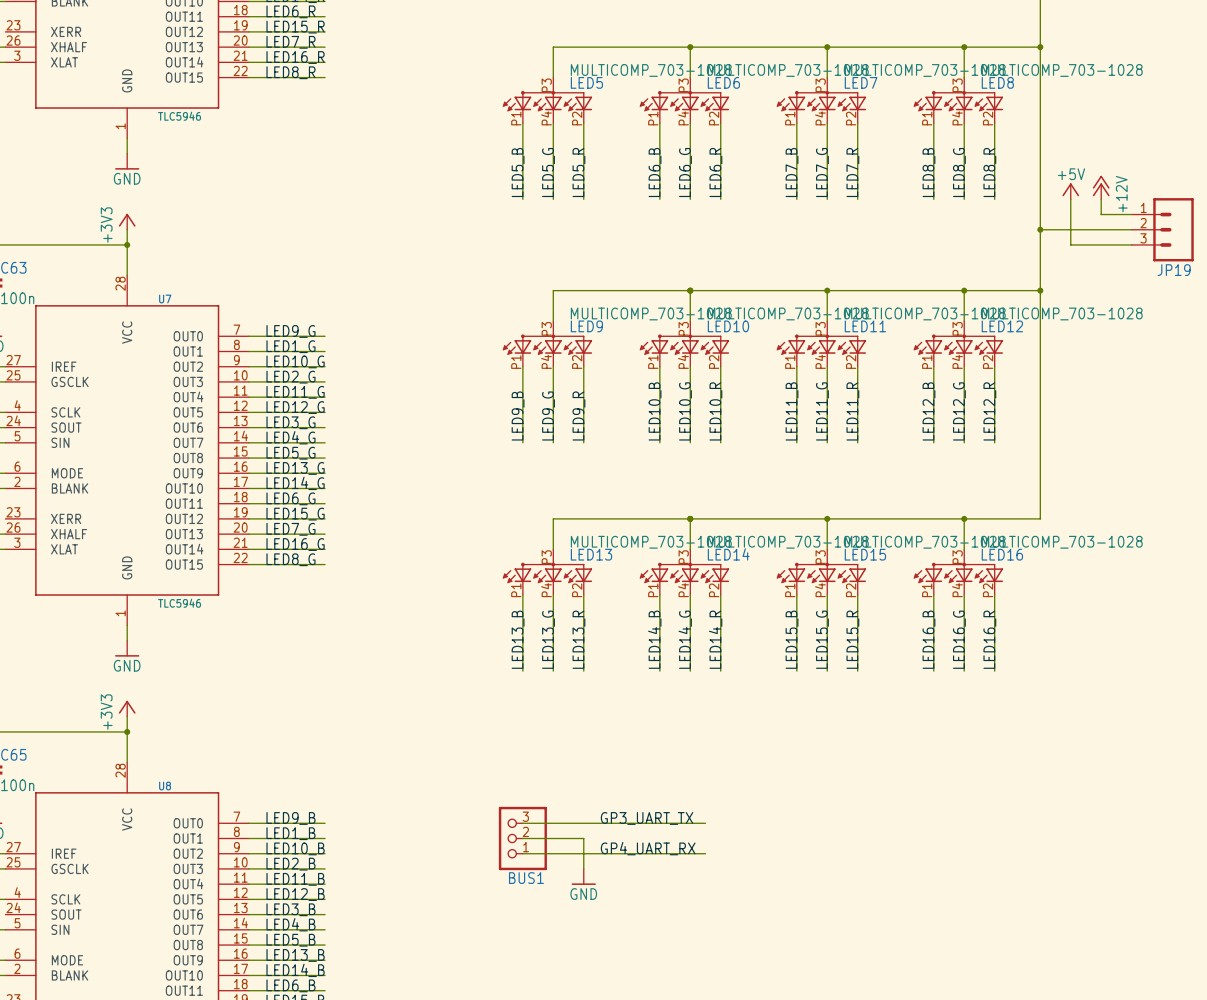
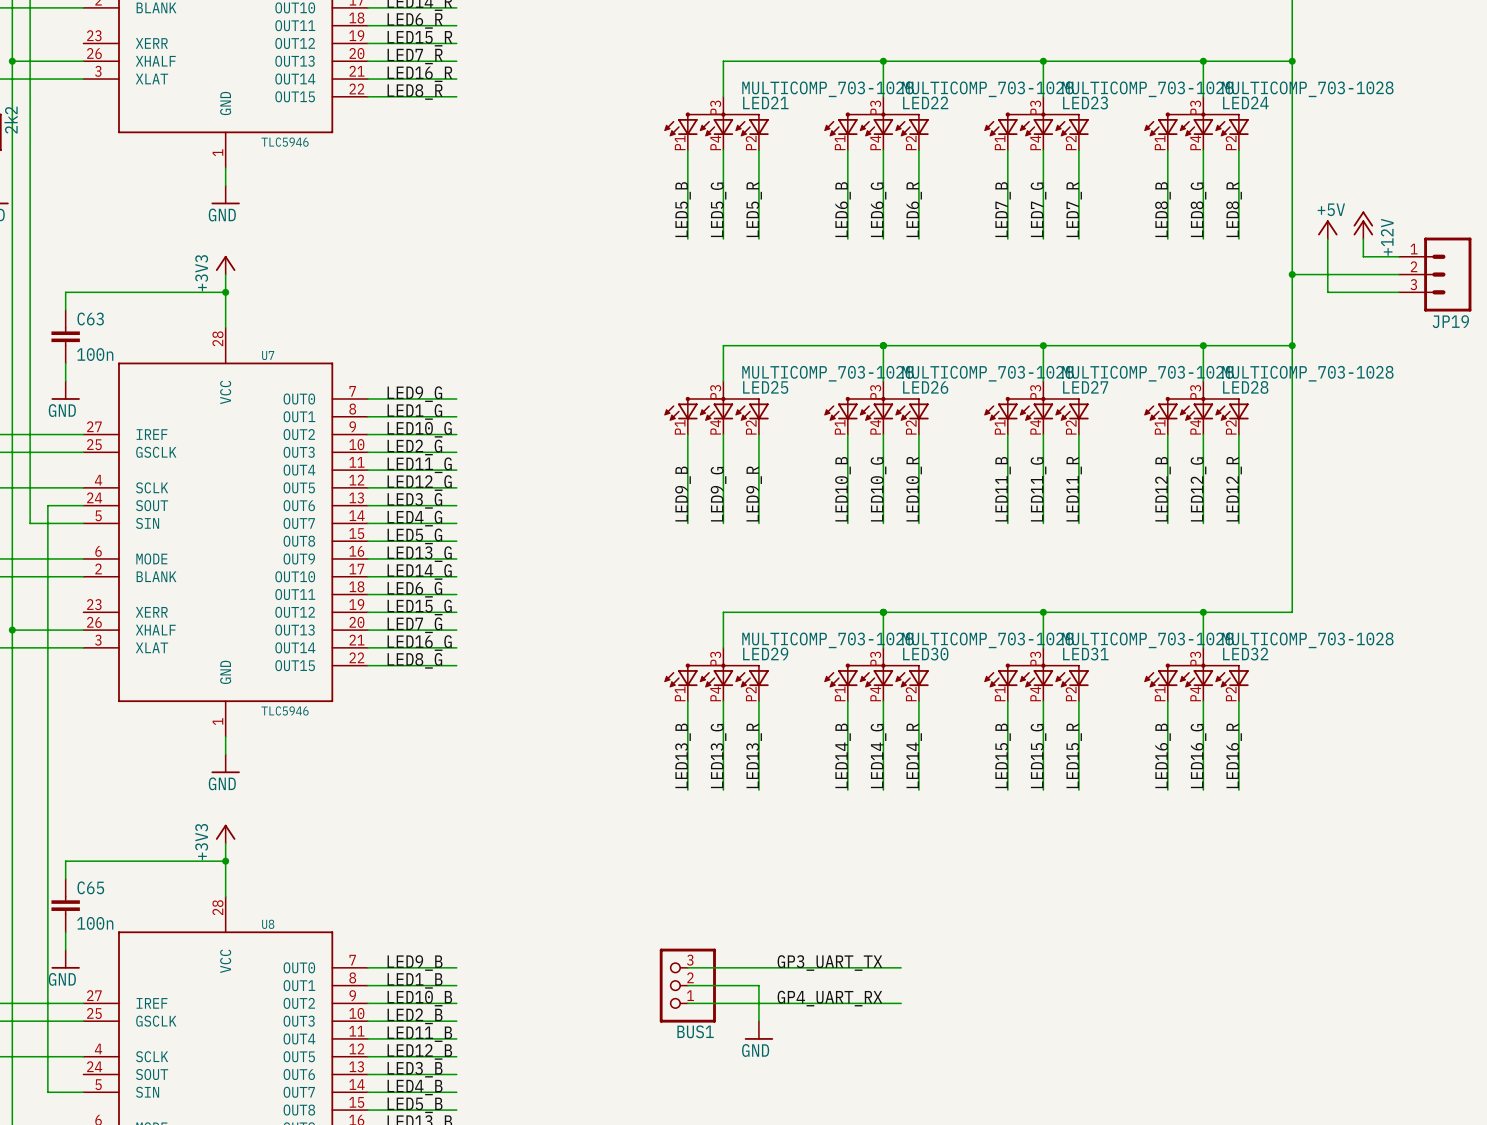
LED5 name: LED5 (586, 82) -> LED21 (765, 102)
LED6 name: LED6 (723, 82) -> LED22 (925, 102)
LED7 name: LED7 (861, 82) -> LED23 (1085, 103)
LED8 name: LED8 (997, 82) -> LED24 (1245, 102)
LED9 name: LED9 (586, 326) -> LED25 (765, 387)
LED10 name: LED10 (728, 326) -> LED26 (925, 387)
LED11 name: LED11 (865, 326) -> LED27 (1085, 387)
LED12 name: LED12 (1002, 326) -> LED28 (1245, 387)
LED13 name: LED13 (591, 554) -> LED29 (765, 653)
LED14 name: LED14 (728, 554) -> LED30 (925, 654)
LED15 name: LED15 (865, 554) -> LED31 (1085, 654)
LED16 name: LED16 (1002, 554) -> LED32 (1245, 654)

